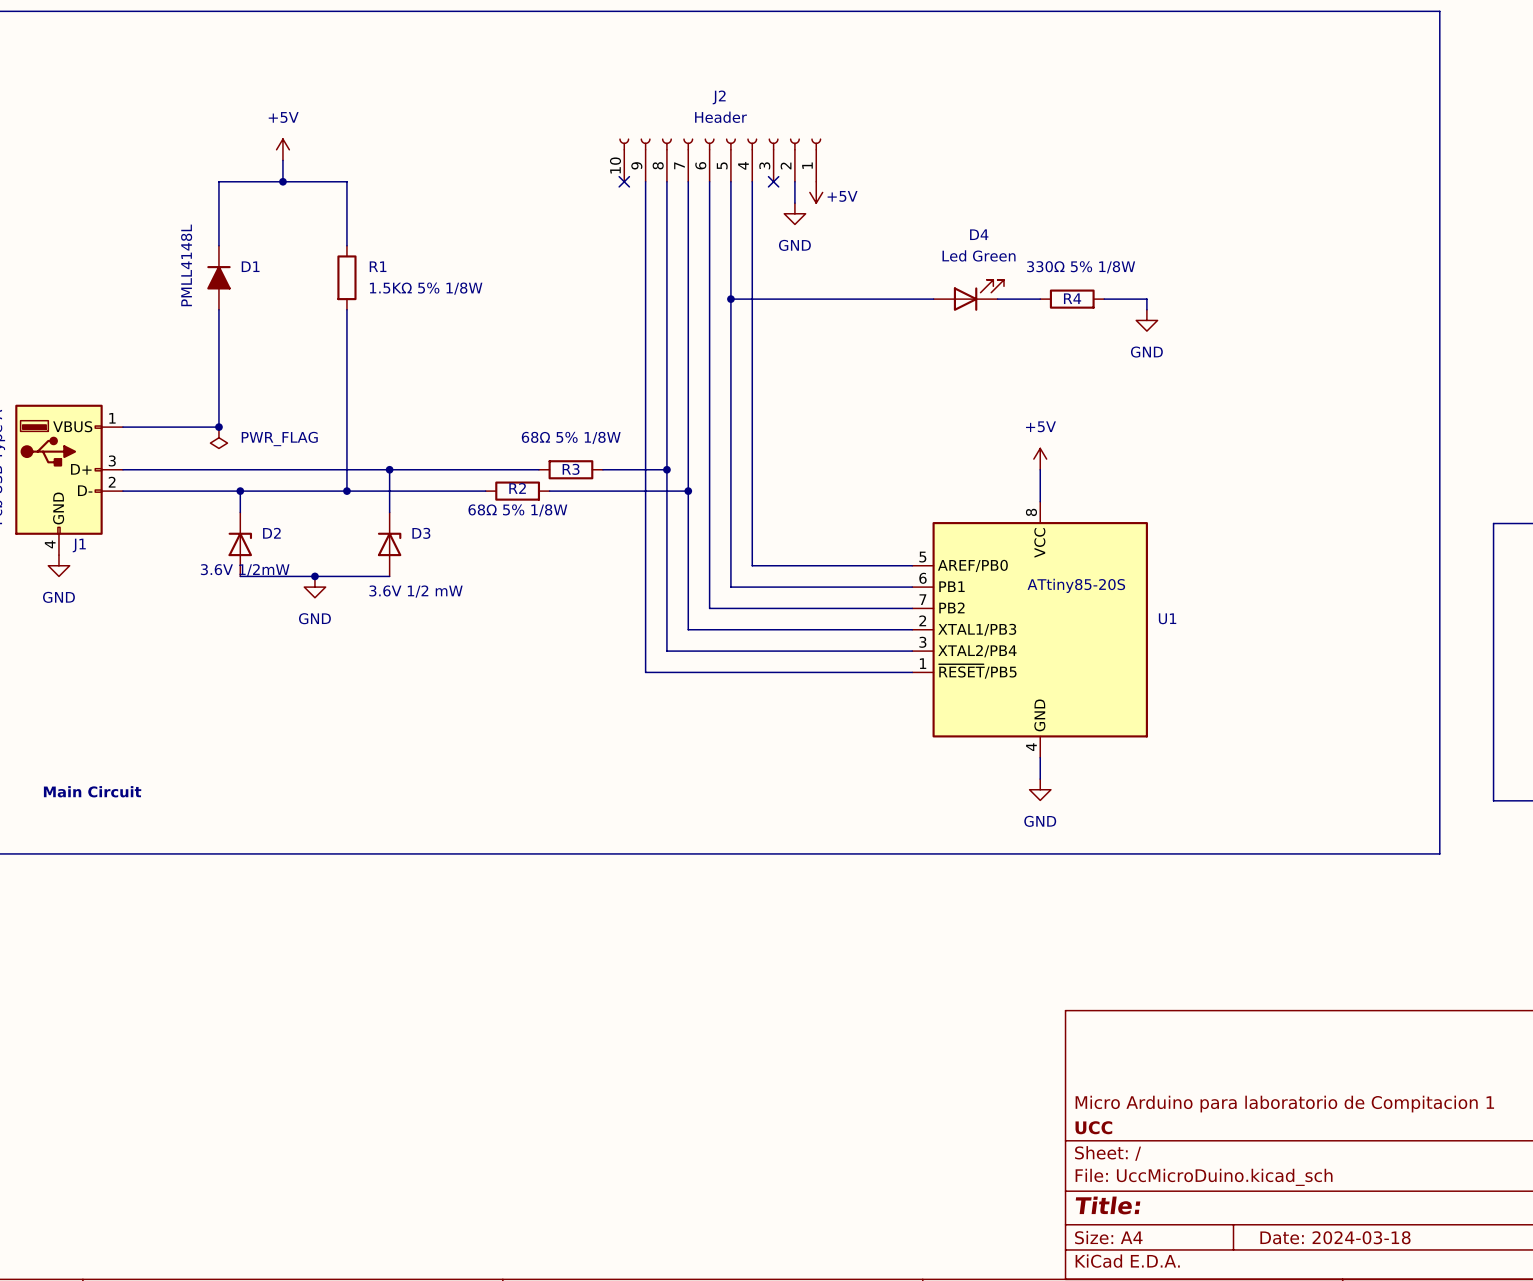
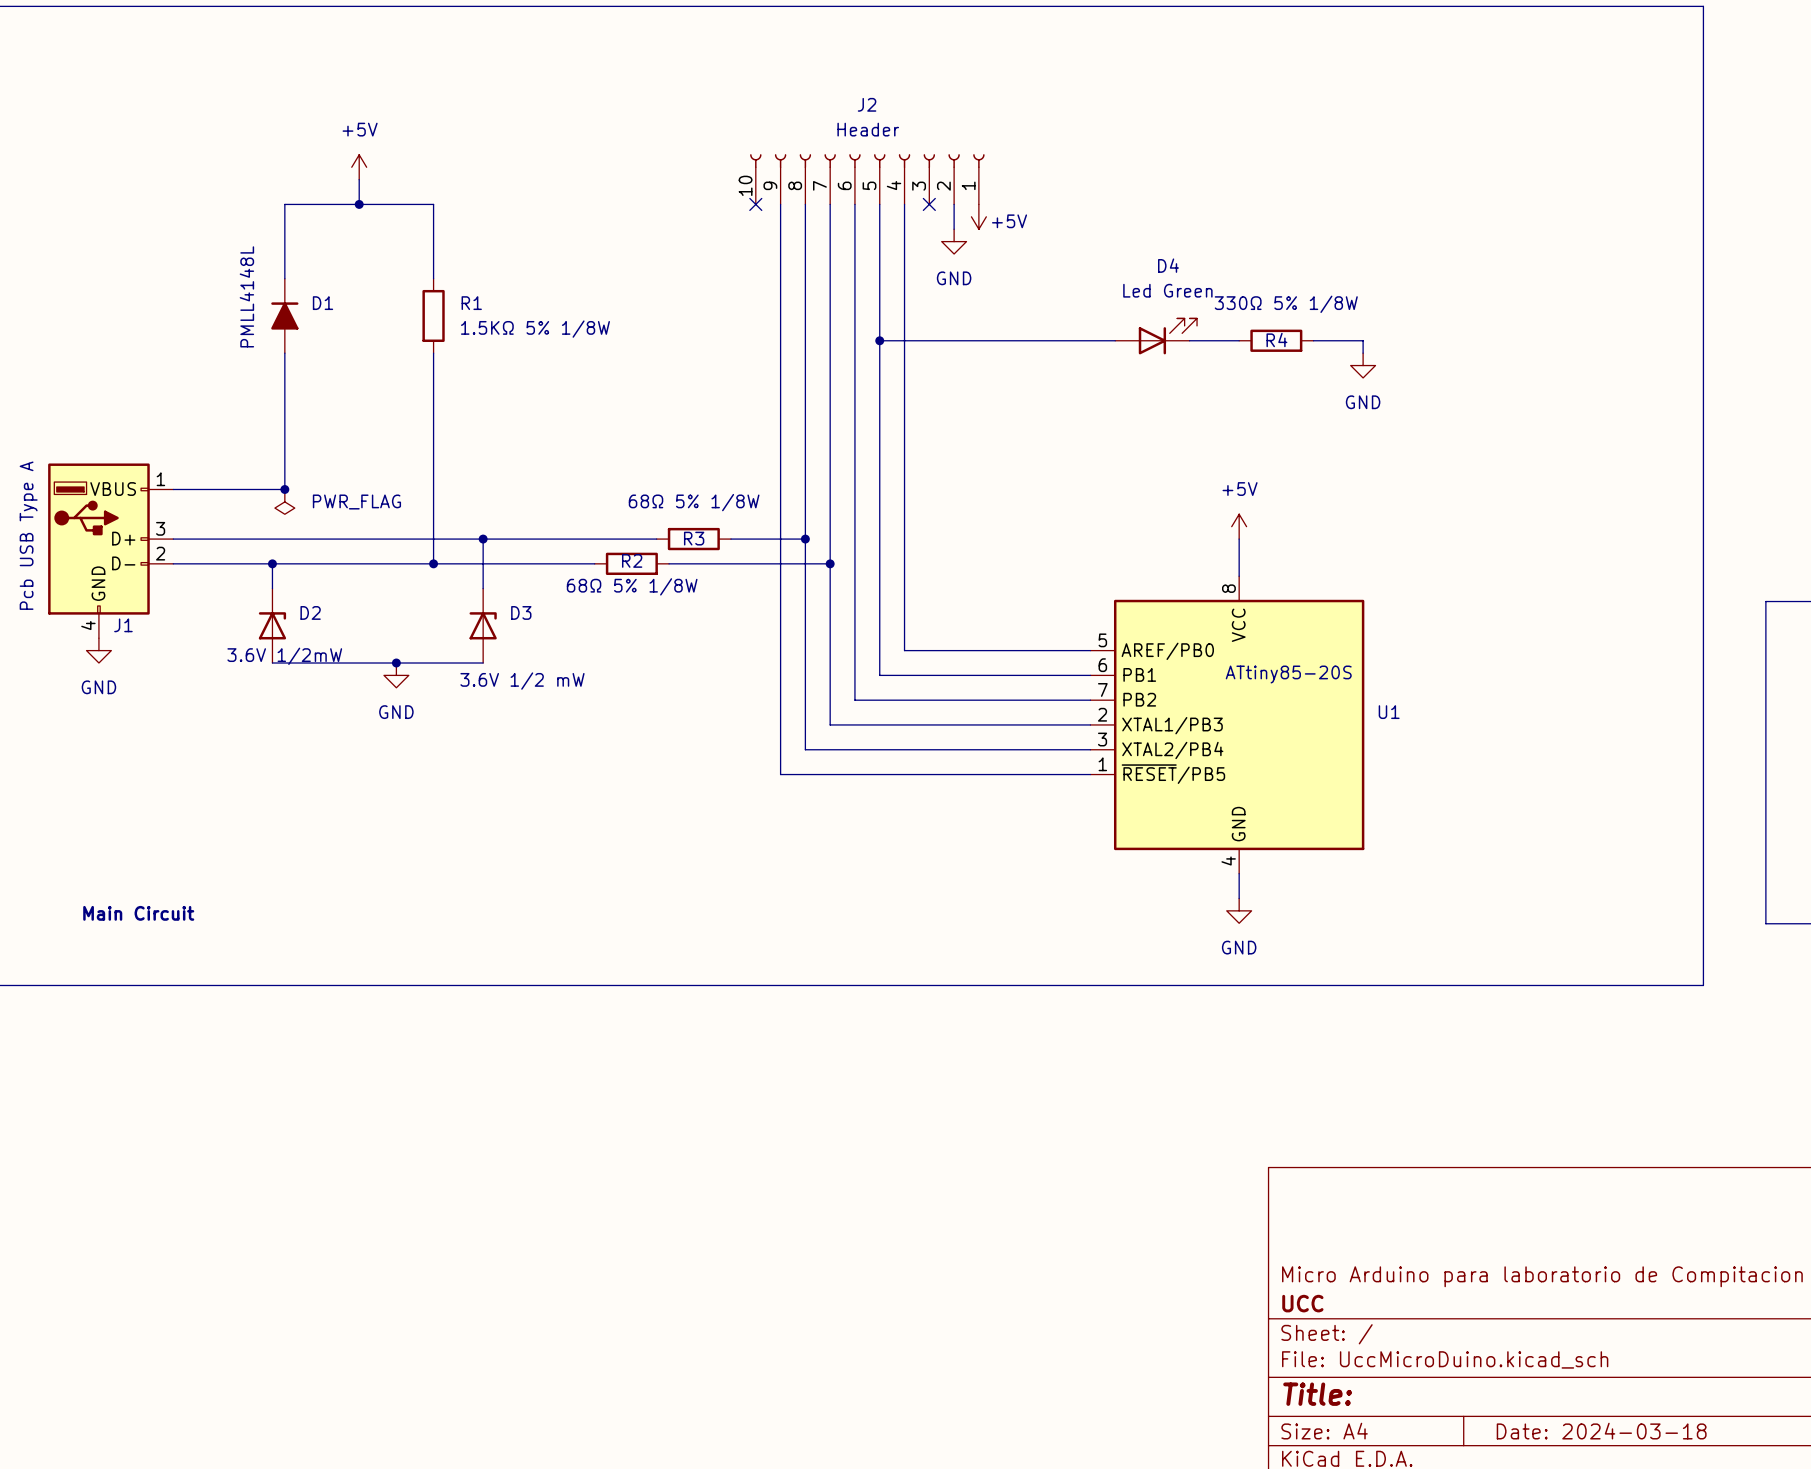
wire: (240, 491) (240, 512) -> (272, 563) (272, 588)
junction position: (240, 491) -> (272, 563)
D2 position: (240, 544) -> (272, 625)
wire: none -> (272, 663) (309, 663)

